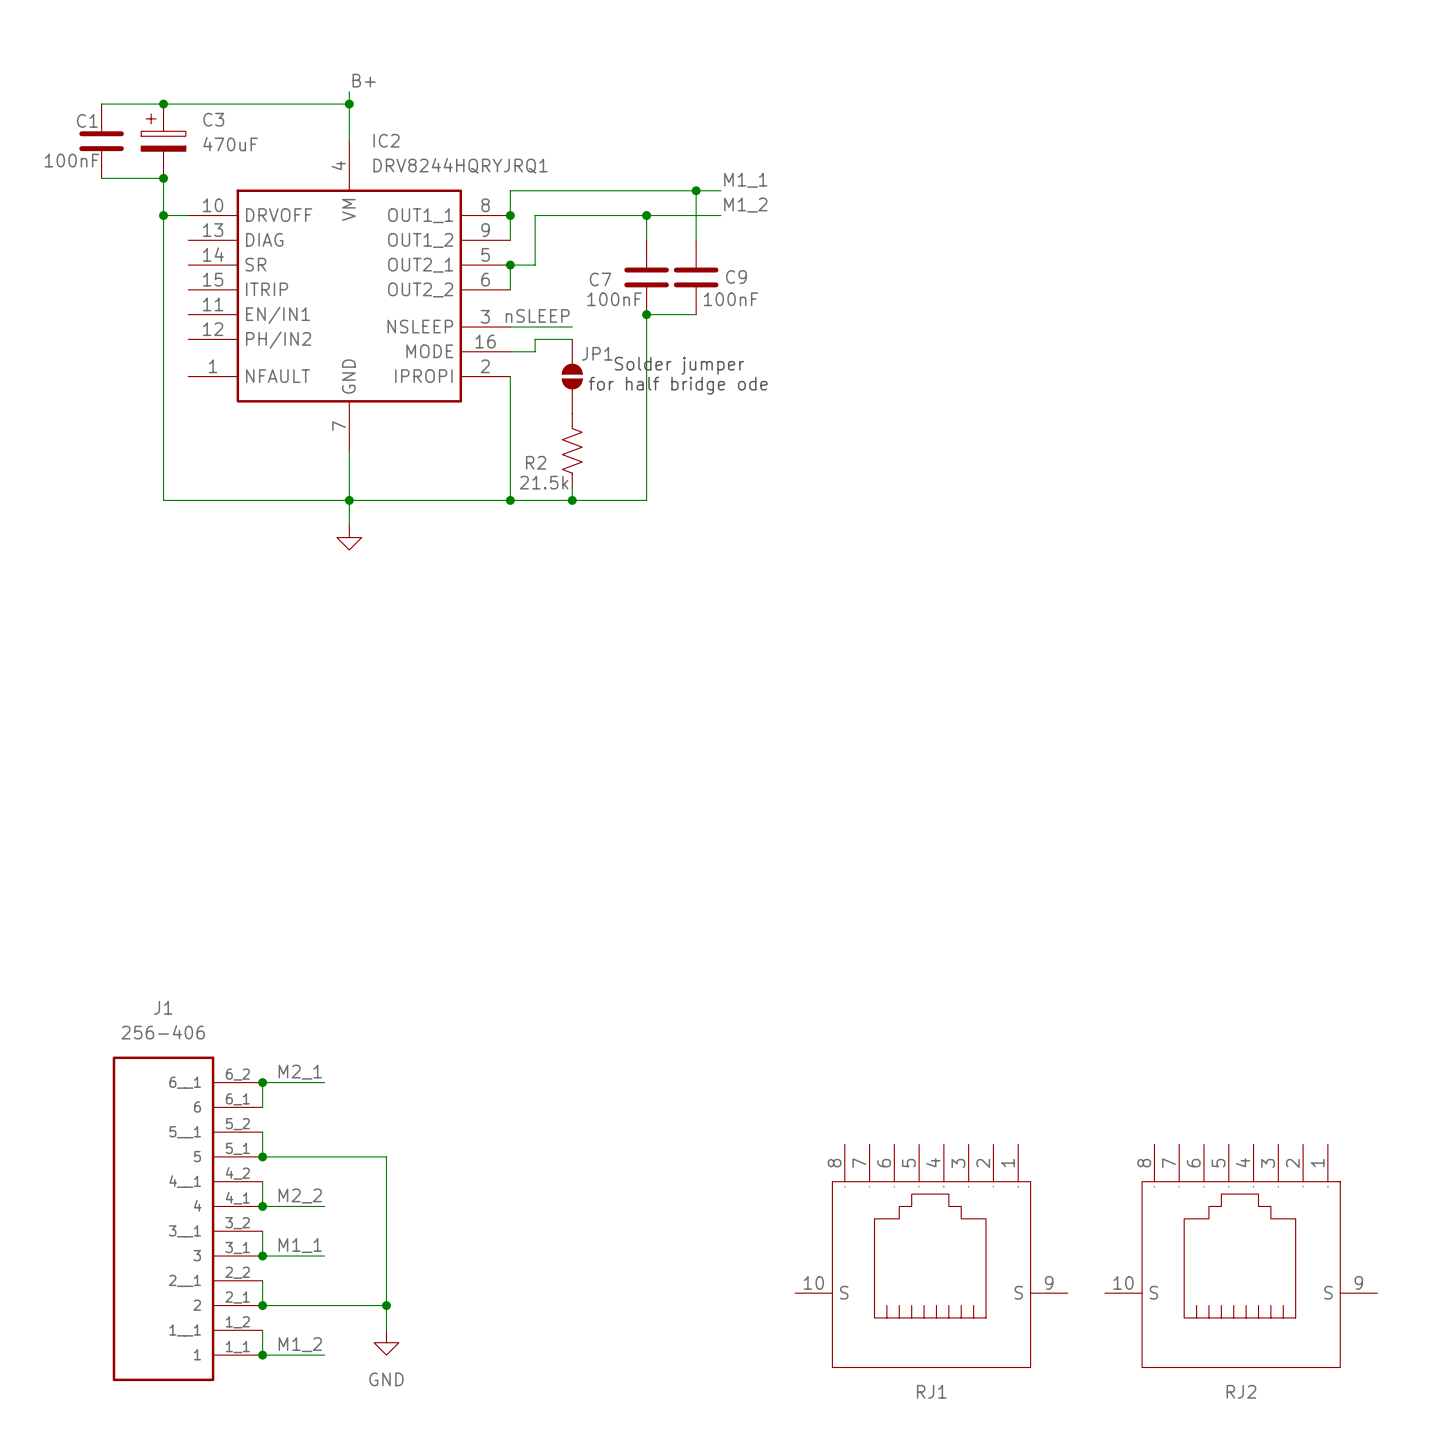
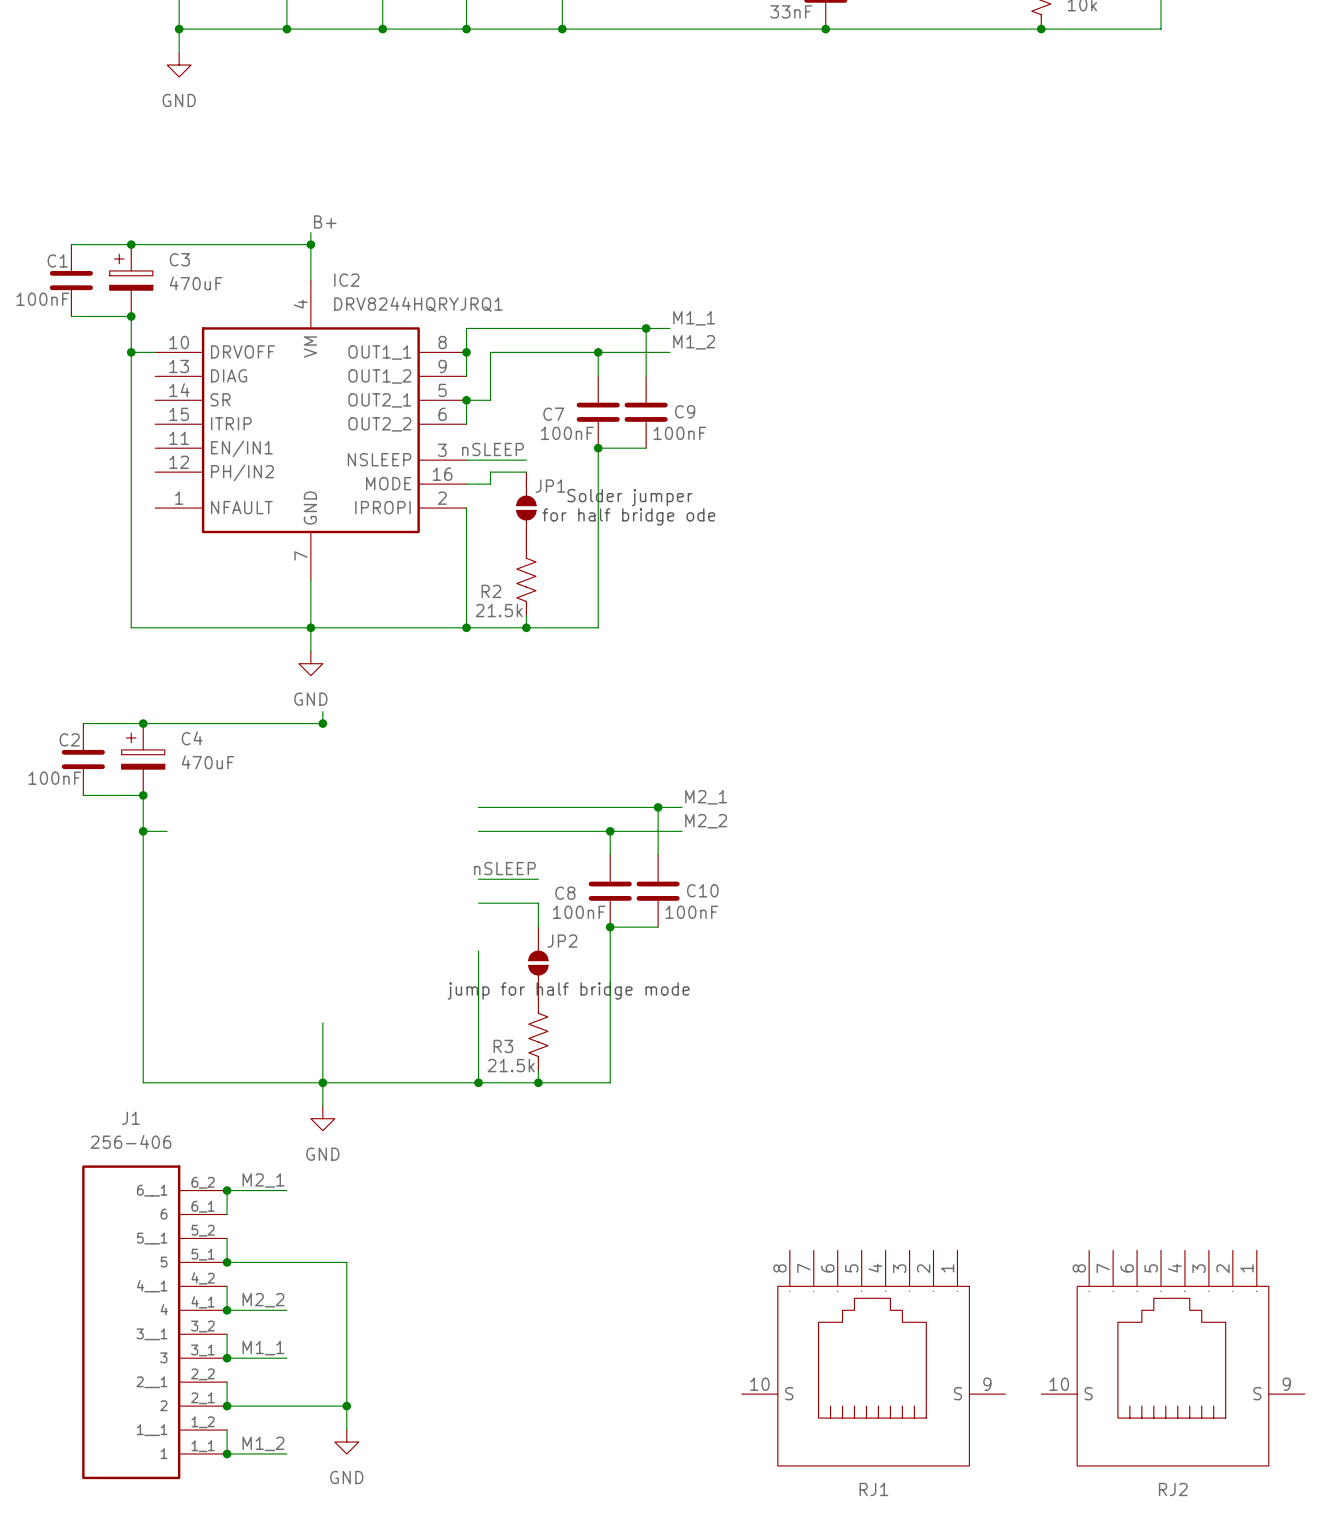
power symbol text: none -> GND (310, 699)
wire: none -> (322, 711) (322, 723) (83, 723)
junction: none -> (143, 723)
junction: none -> (322, 723)
C2: none -> 100nF (83, 759)
C4: none -> 470uF (143, 759)
wire: none -> (83, 795) (143, 795) (143, 1082) (610, 1082) (610, 927) (658, 927)
junction: none -> (143, 795)
label: none -> M2_1 (706, 797)
wire: none -> (478, 807) (682, 807)
wire: none -> (658, 807) (658, 855)
junction: none -> (658, 807)
label: none -> M2_2 (706, 821)
wire: none -> (143, 831) (167, 831)
junction: none -> (143, 831)
wire: none -> (478, 831) (682, 831)
wire: none -> (610, 831) (610, 855)
junction: none -> (610, 831)
label: none -> nSLEEP (504, 868)
wire: none -> (478, 879) (538, 879)
C8: none -> 100nF (610, 891)
C10: none -> 100nF (658, 891)
wire: none -> (478, 903) (538, 903) (538, 927)
junction: none -> (610, 927)
wire: none -> (478, 951) (478, 1082)
JP2: none -> (538, 963)
text: none -> jump for half bridge mode (568, 990)
wire: none -> (322, 1022) (322, 1106)
R3: none -> 21.5k (538, 1034)
wire: none -> (538, 1070) (538, 1082)
junction: none -> (322, 1082)
junction: none -> (478, 1082)
junction: none -> (538, 1082)
power symbol: none -> GND (322, 1118)

